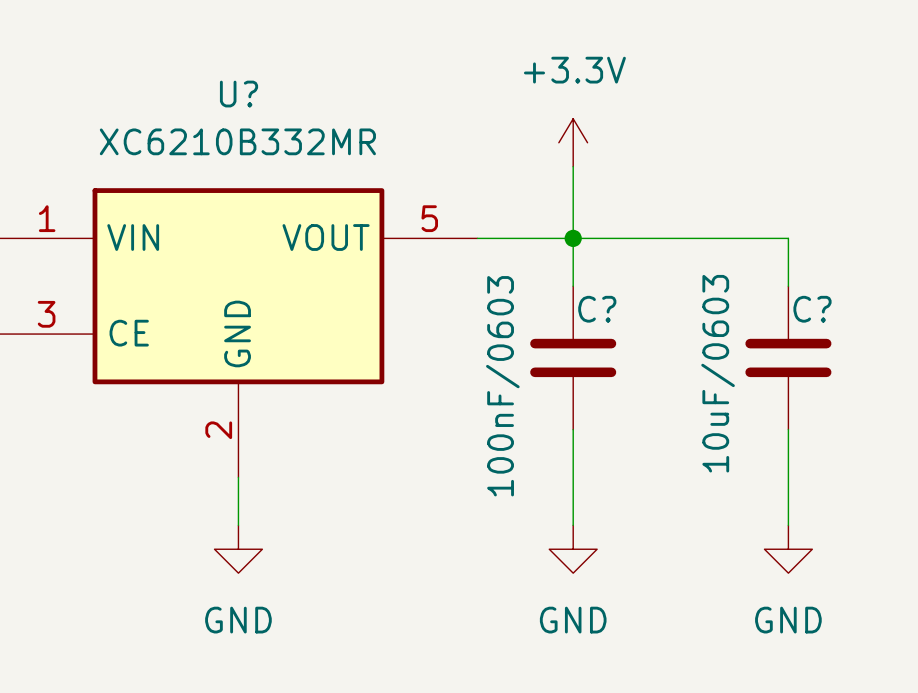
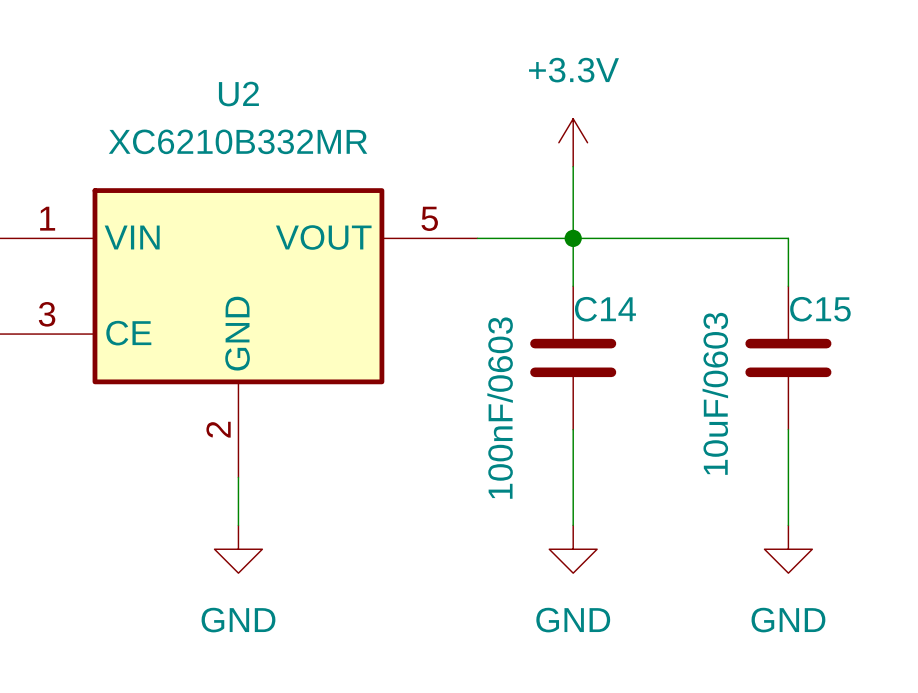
U? name: U? (239, 94) -> U2 (238, 94)
C? name: C? (597, 309) -> C14 (605, 309)
C? name: C? (812, 309) -> C15 (820, 309)

